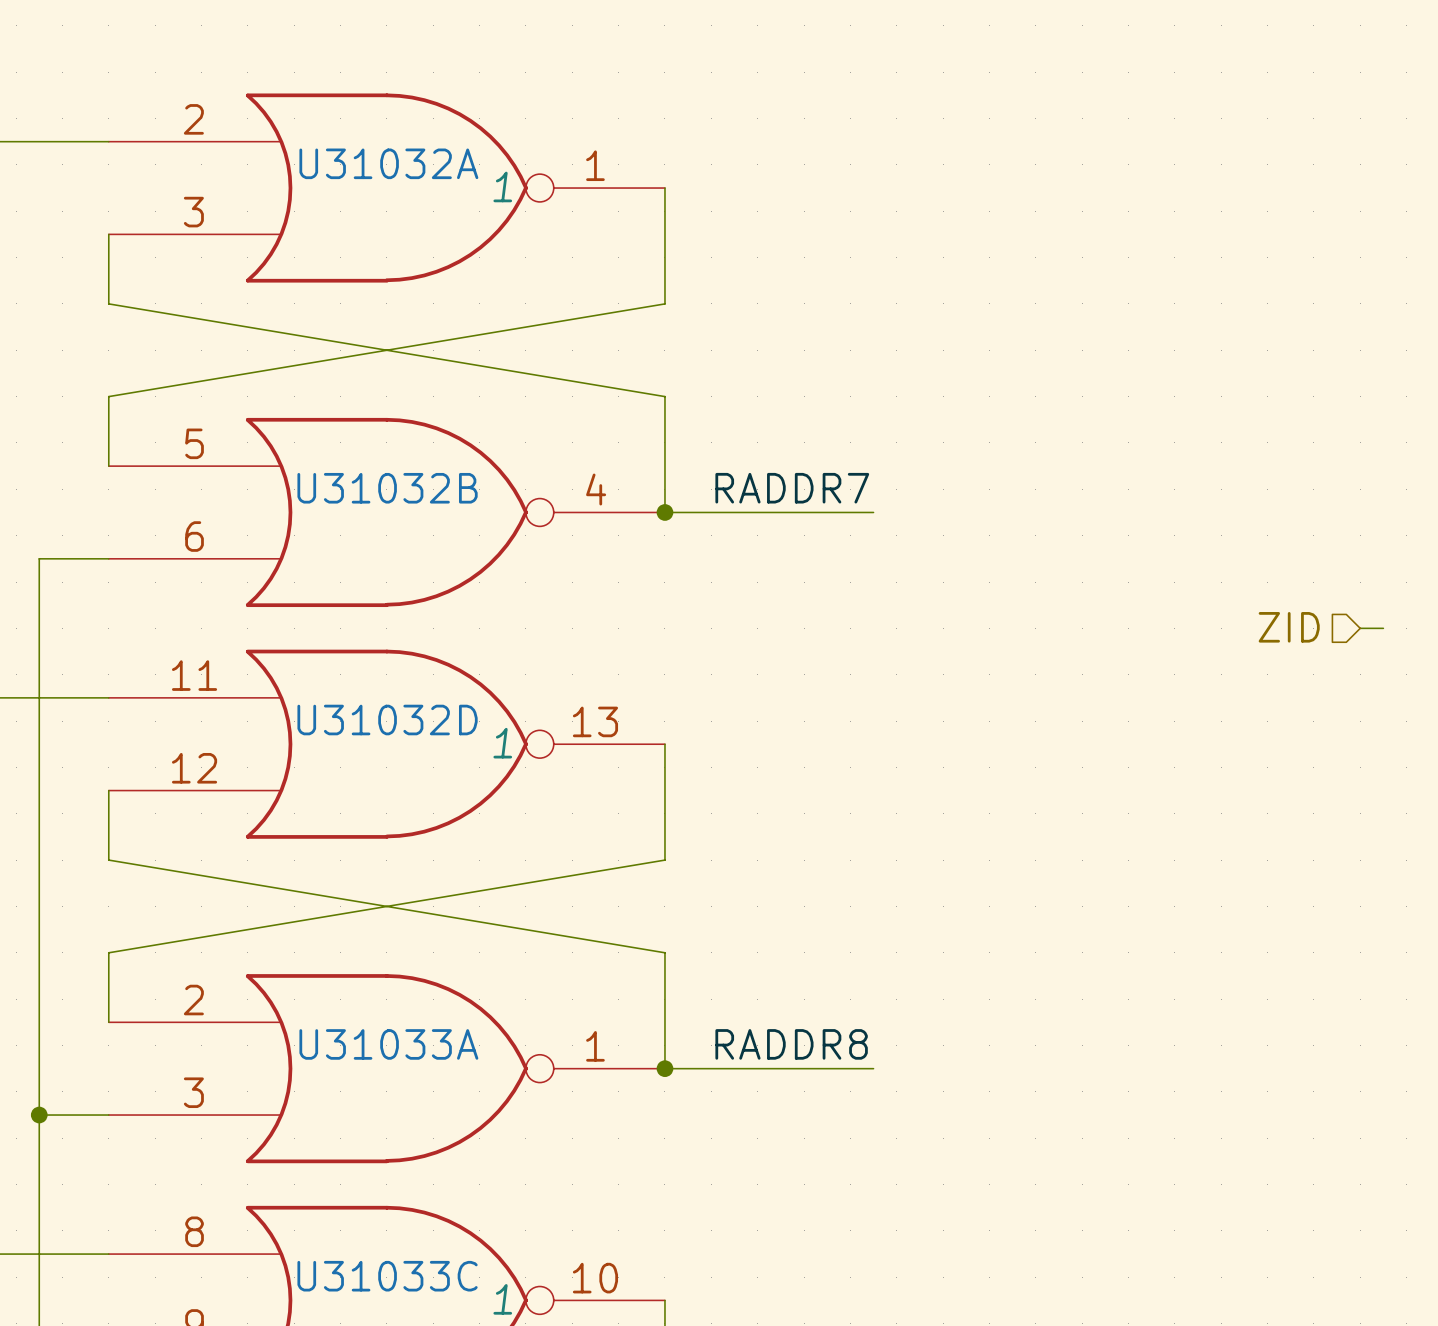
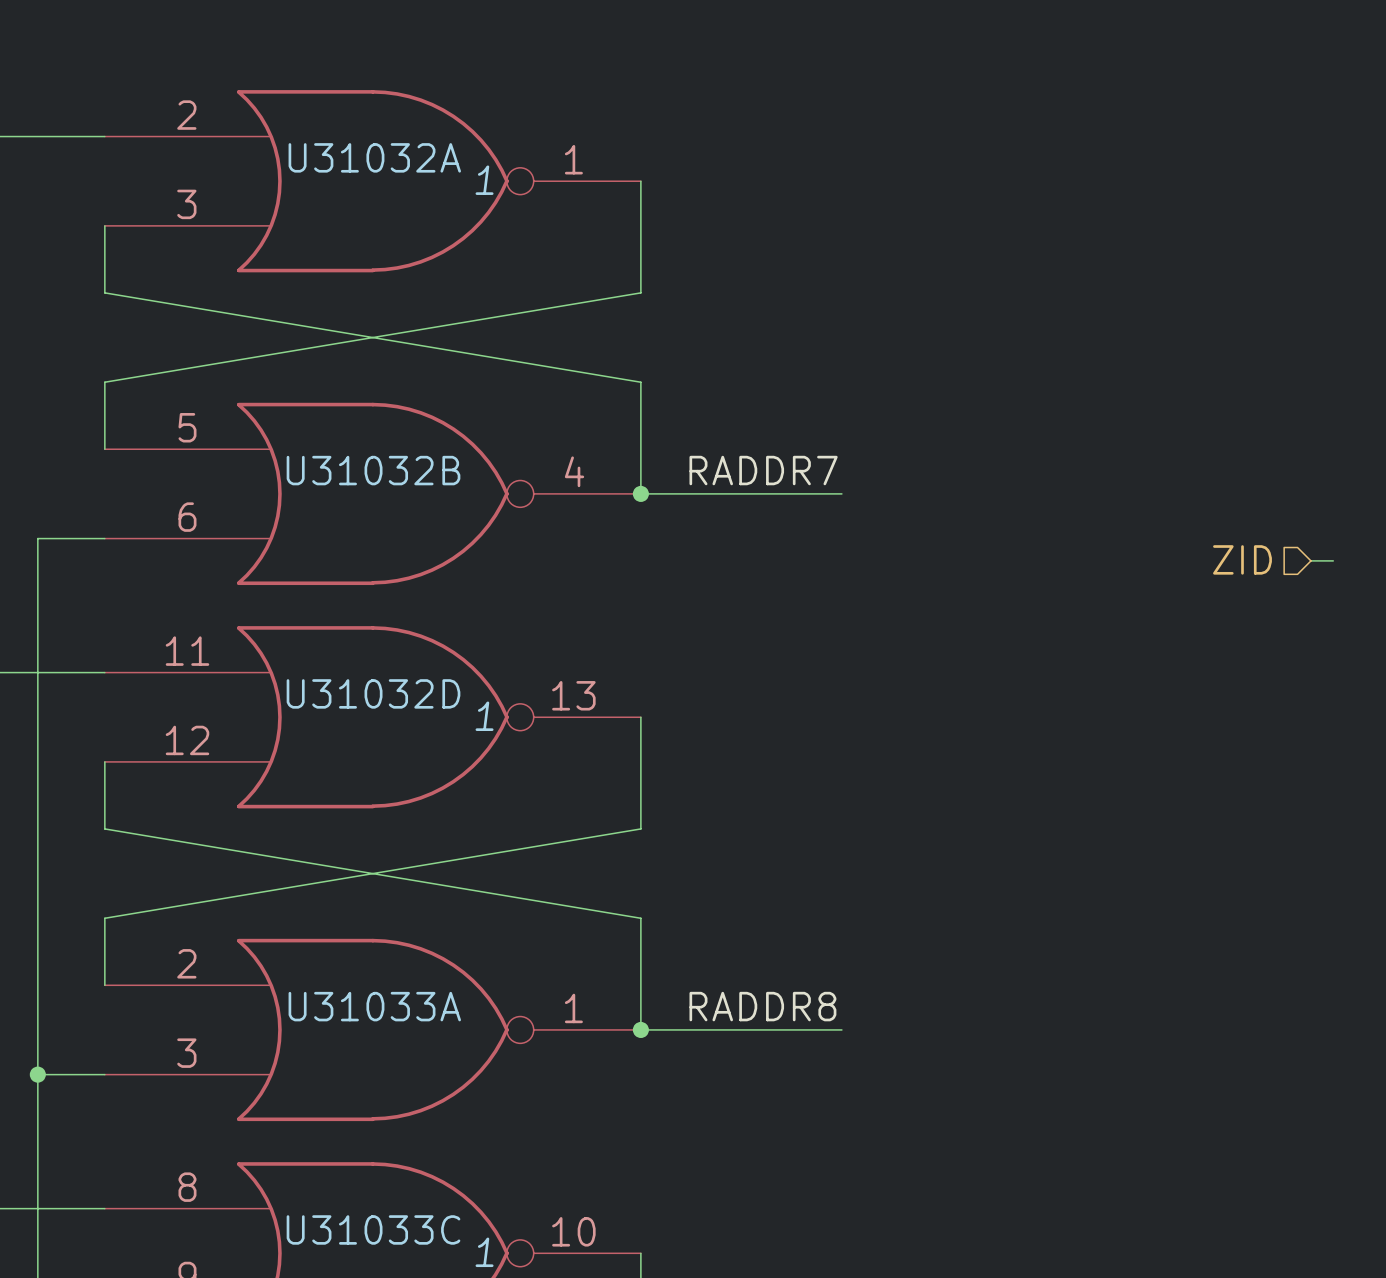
hierarchical label position: ZID (1289, 627) -> ZID (1242, 559)
wire: (1360, 628) (1383, 628) -> (1310, 560) (1333, 560)

